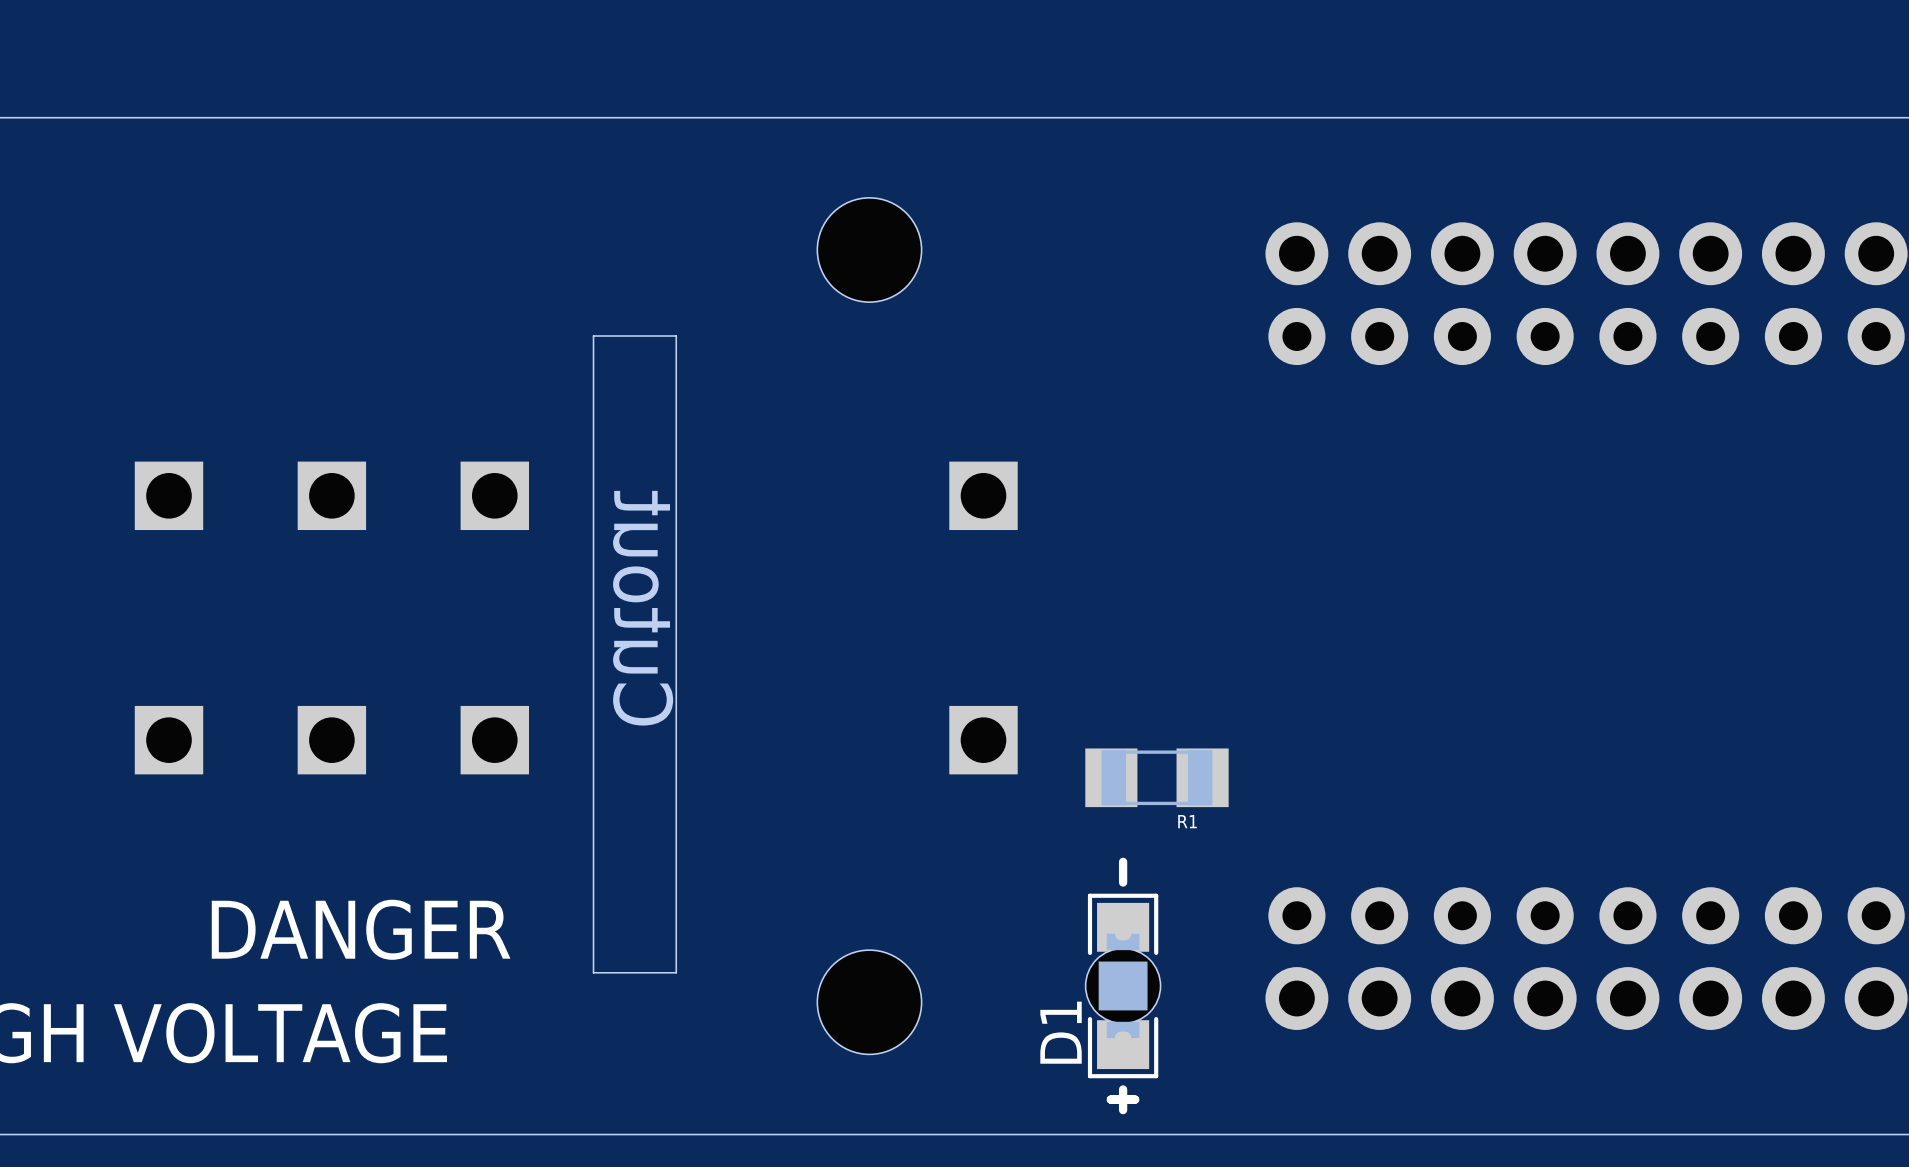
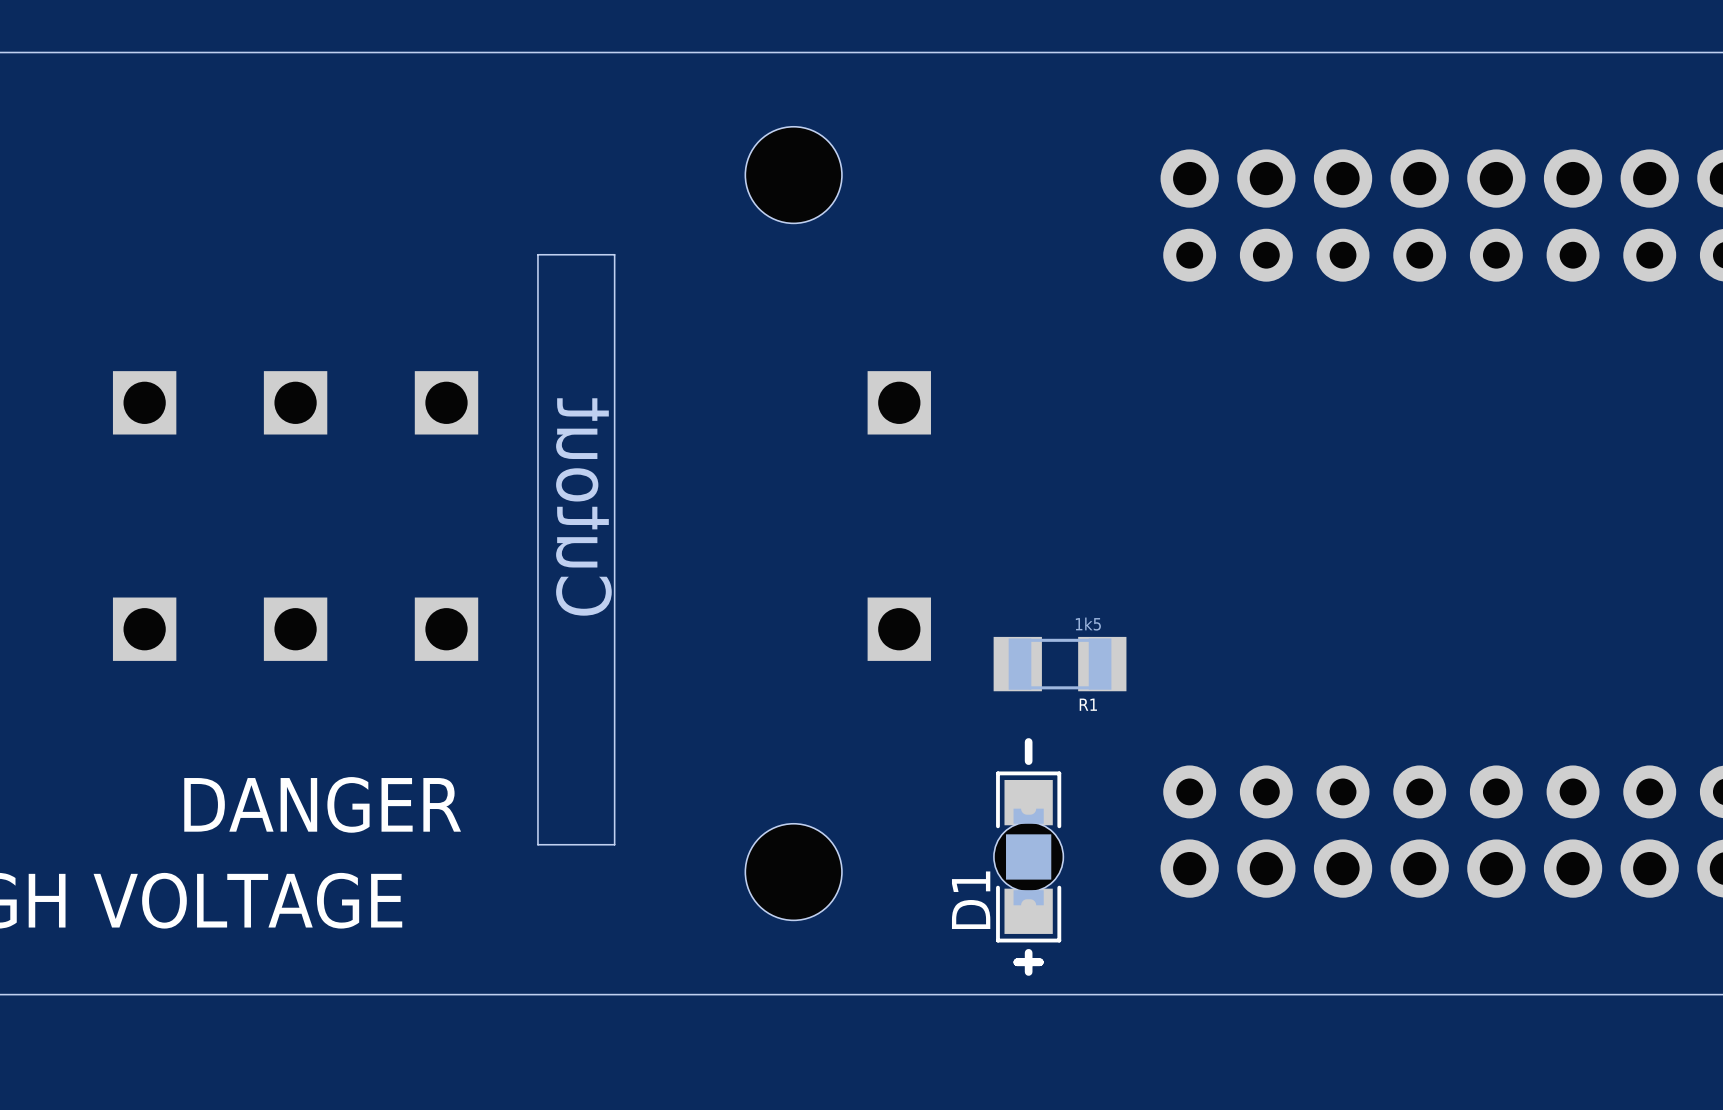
R1 value: none -> 1k5 (1088, 624)

